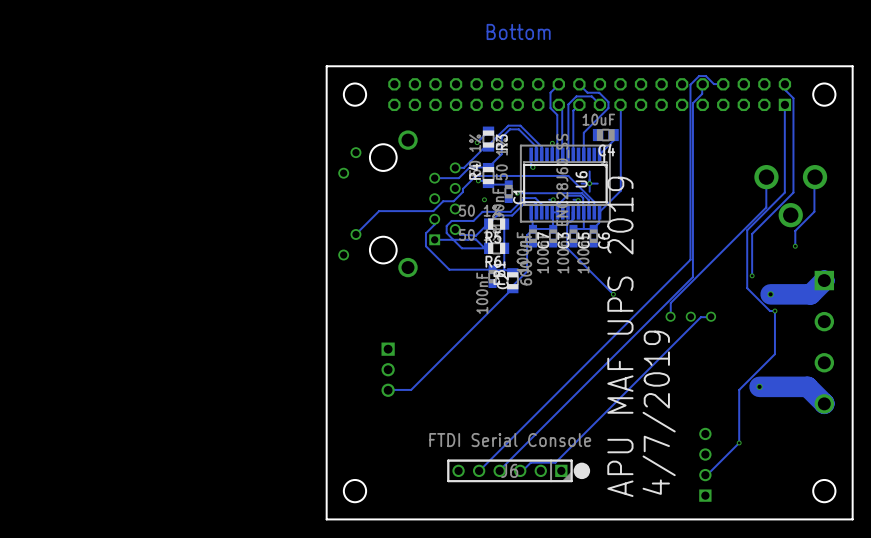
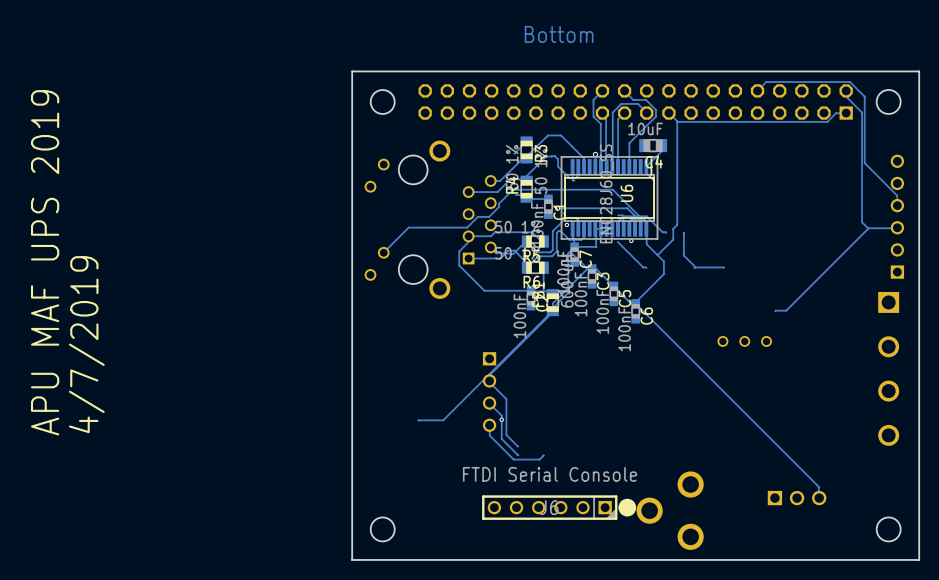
track: (702, 84) (702, 93) (692, 103) (692, 277) (499, 470) -> (757, 90) (766, 82) (850, 82) (864, 96) (864, 163) (897, 195) (897, 205)
track: (723, 84) (713, 84) (705, 76) (699, 76) (690, 84) (690, 259) (479, 470) -> none
track: (793, 98) (793, 192) (752, 233) (752, 275) -> (855, 105) (862, 112) (862, 222) (868, 228)
track: (620, 105) (620, 190) (599, 212) (599, 222) (593, 229) (573, 229) -> (669, 113) (677, 121) (827, 121) (836, 113) (846, 113)
track: (784, 105) (784, 192) (747, 230) (747, 288) (770, 311) (774, 311) (774, 354) (739, 389) (739, 442) (705, 475) -> none
track: none -> (677, 121) (677, 224) (673, 228) (673, 239) (657, 255)
via: (477, 142) -> none
track: (536, 154) (536, 146) (518, 129) (509, 129) (501, 137) (501, 154) (488, 167) (470, 166) (458, 178) -> (578, 166) (578, 175) (575, 177) (569, 177) (558, 166) (558, 159) (554, 156) (546, 156) (526, 176) (526, 180) (510, 179) (497, 192) (494, 192)
via: (533, 167) -> none
track: (589, 171) (589, 191) -> none
track: (766, 177) (766, 207) (670, 302) (670, 316) -> none
track: (815, 177) (814, 211) (795, 230) (795, 246) -> none
via: (478, 180) -> none
via: (589, 183) -> none
track: (597, 183) (581, 183) -> none
part: (790, 196) -> none
via: (484, 199) -> none
track: (553, 199) (549, 199) -> none
via: (553, 199) -> none
via: (578, 200) -> none
part: none -> (897, 216)
track: (525, 202) (512, 215) (497, 215) (488, 224) -> (566, 217) (552, 231) (552, 249) (550, 252) (537, 252) (526, 241)
via: none -> (566, 224)
track: none -> (897, 227) (868, 228) (786, 310) (775, 310)
track: (541, 212) (541, 204) (535, 198) (524, 198) (510, 211) (482, 211) (473, 220) (451, 220) (446, 225) (446, 233) (461, 248) (488, 248) -> (584, 228) (584, 237) (581, 239) (569, 239) (558, 231) (556, 232) (556, 251) (552, 256) (538, 256) (526, 267) (526, 262) (514, 250) (508, 250) (500, 258)
track: (573, 212) (572, 219) (567, 224) (567, 248) (613, 294) -> (618, 228) (618, 221) (623, 216) (646, 216) (662, 232) (666, 232)
track: (583, 212) (583, 228) -> (629, 228) (629, 221) (632, 218) (644, 218) (645, 220) (646, 244) (663, 261) (663, 274) (635, 303)
track: (583, 212) (583, 198) (580, 195) (567, 195) (557, 204) (557, 212) -> none
track: none -> (683, 232) (683, 255) (694, 267) (724, 267)
via: none -> (631, 240)
track: (504, 224) (504, 248) -> (544, 241) (532, 232) (495, 232) (491, 236) (468, 236)
track: none -> (617, 241) (643, 267) (646, 267)
track: none -> (570, 251) (587, 268)
C3 position: (553, 236) -> (592, 276)
C5 position: (573, 236) -> (613, 293)
C6 position: (593, 236) -> (635, 311)
track: (464, 239) (475, 239) (484, 248) -> none
text: none -> APU MAF UPS 2019 (45, 262)
via: (795, 246) -> none
track: none -> (587, 268) (596, 269) (630, 303) (635, 303)
track: none -> (587, 268) (552, 303) (552, 312) (489, 375) (489, 381) (506, 399) (506, 434) (518, 446)
via: (752, 275) -> none
track: (824, 280) (810, 294) (770, 294) -> none
track: none -> (635, 303) (818, 486) (819, 498)
via: (613, 294) -> none
via: (770, 294) -> none
via: (774, 311) -> none
track: (711, 316) (700, 317) (555, 462) (530, 462) (520, 470) -> none
text: none -> 4/7/2019 (86, 344)
text: APU MAF UPS 2019 (620, 336) -> none
part: none -> (489, 392)
part: (388, 369) -> none
track: none -> (489, 403) (501, 415) (501, 438) (518, 455)
track: (759, 386) (807, 386) (824, 403) -> none
via: (759, 386) -> none
via: none -> (501, 419)
track: none -> (489, 425) (489, 435) (513, 459) (539, 459) (543, 455)
text: 4/7/2019 (659, 412) -> none
via: (739, 442) -> none
part: none -> (797, 498)
part: (705, 464) -> none
part: none -> (670, 510)

